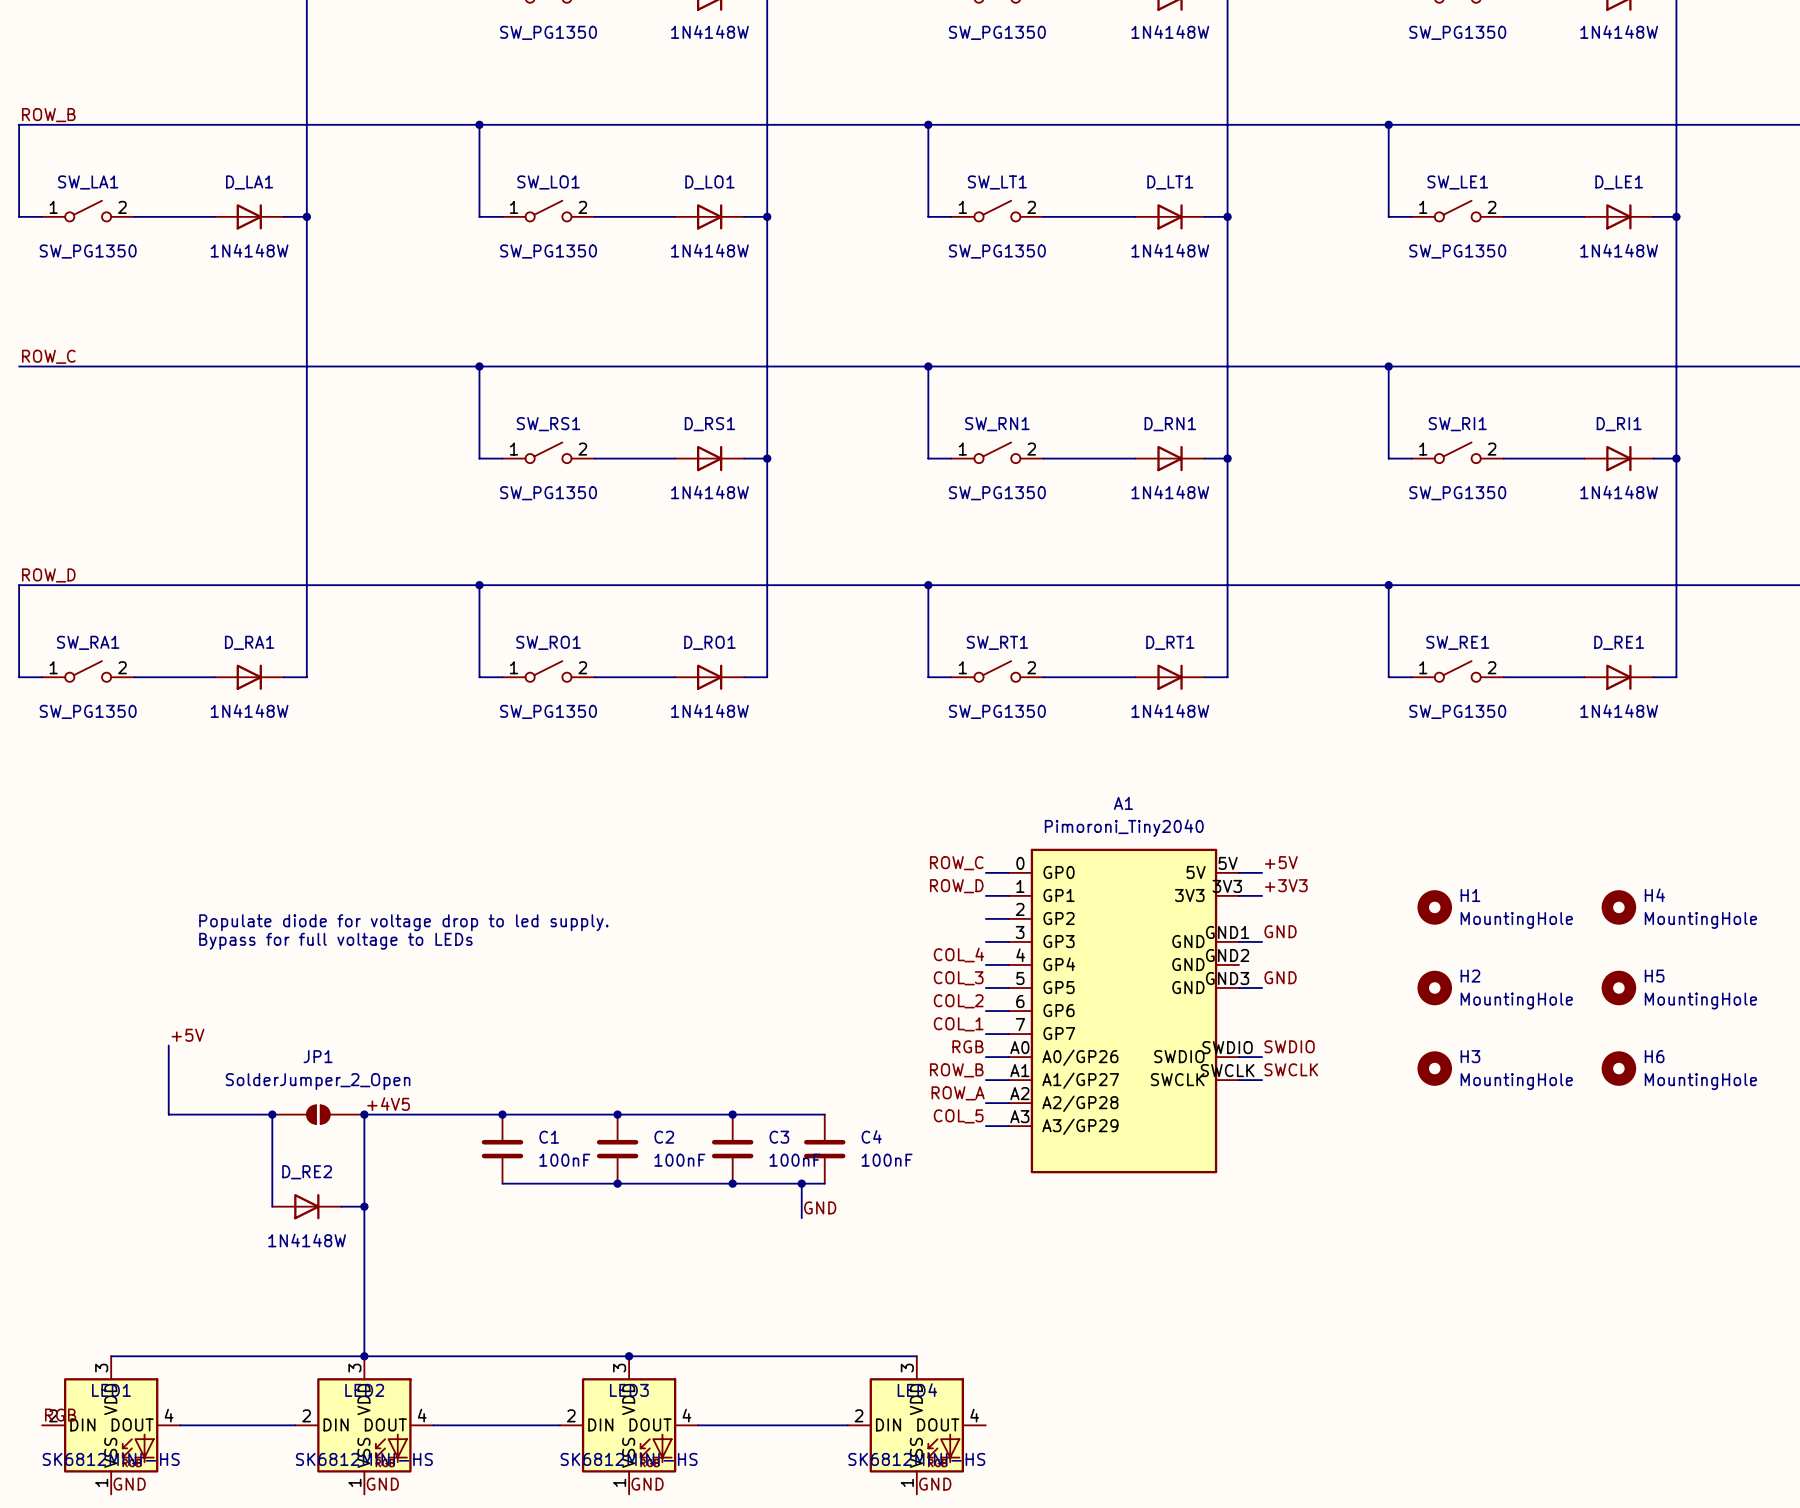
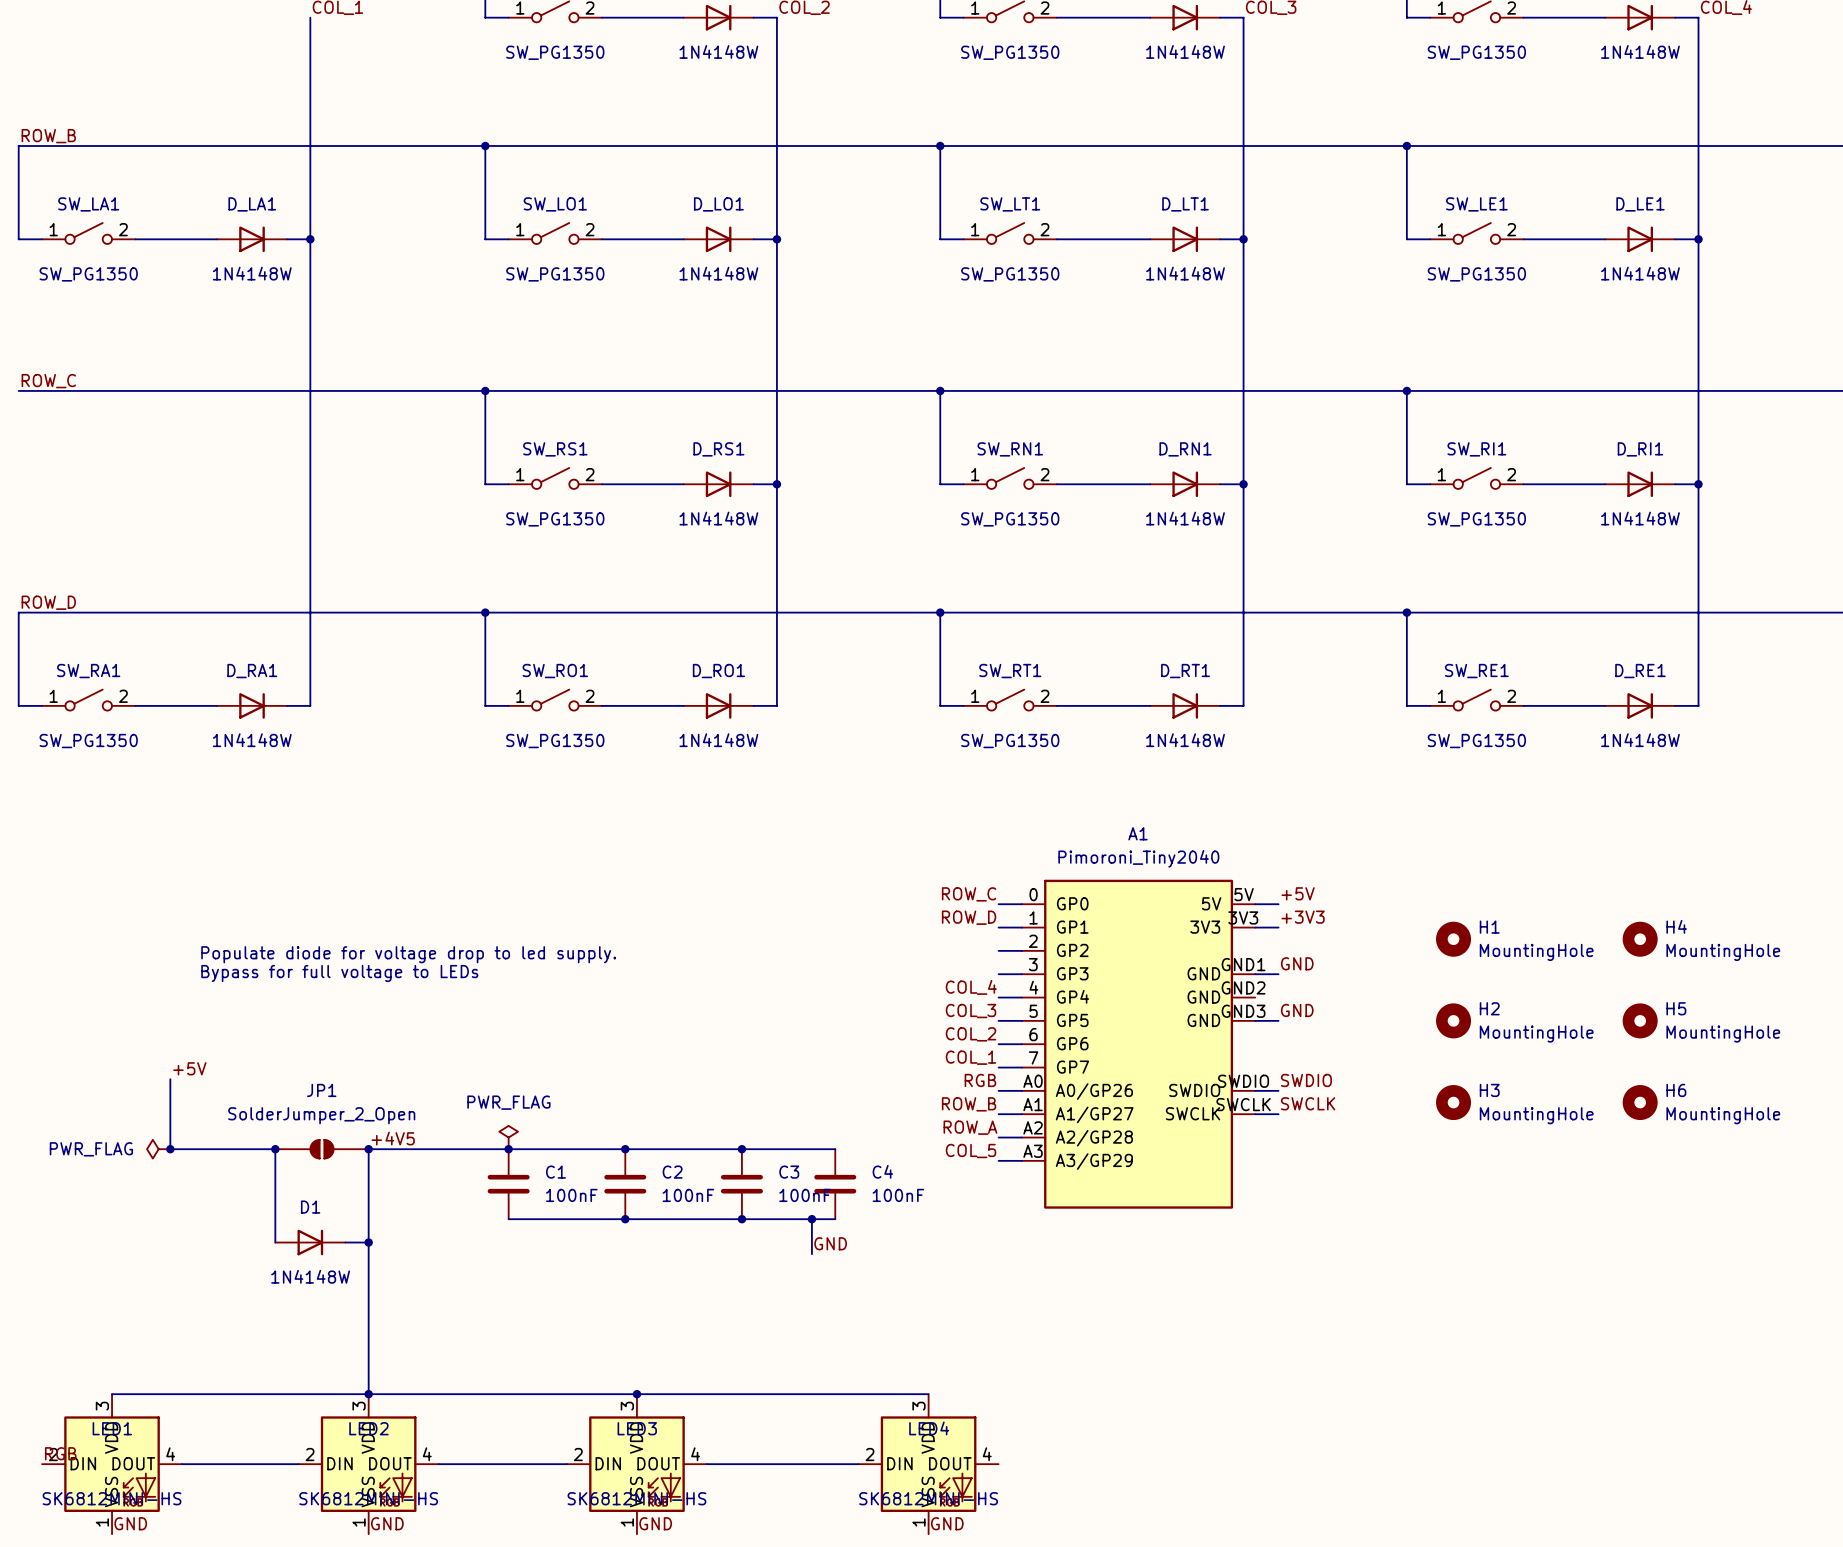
power symbol: none -> PWR_FLAG (508, 1137)
power symbol: none -> PWR_FLAG (158, 1149)
junction: none -> (170, 1149)
D_RE2 name: D_RE2 (307, 1172) -> D1 (310, 1207)

